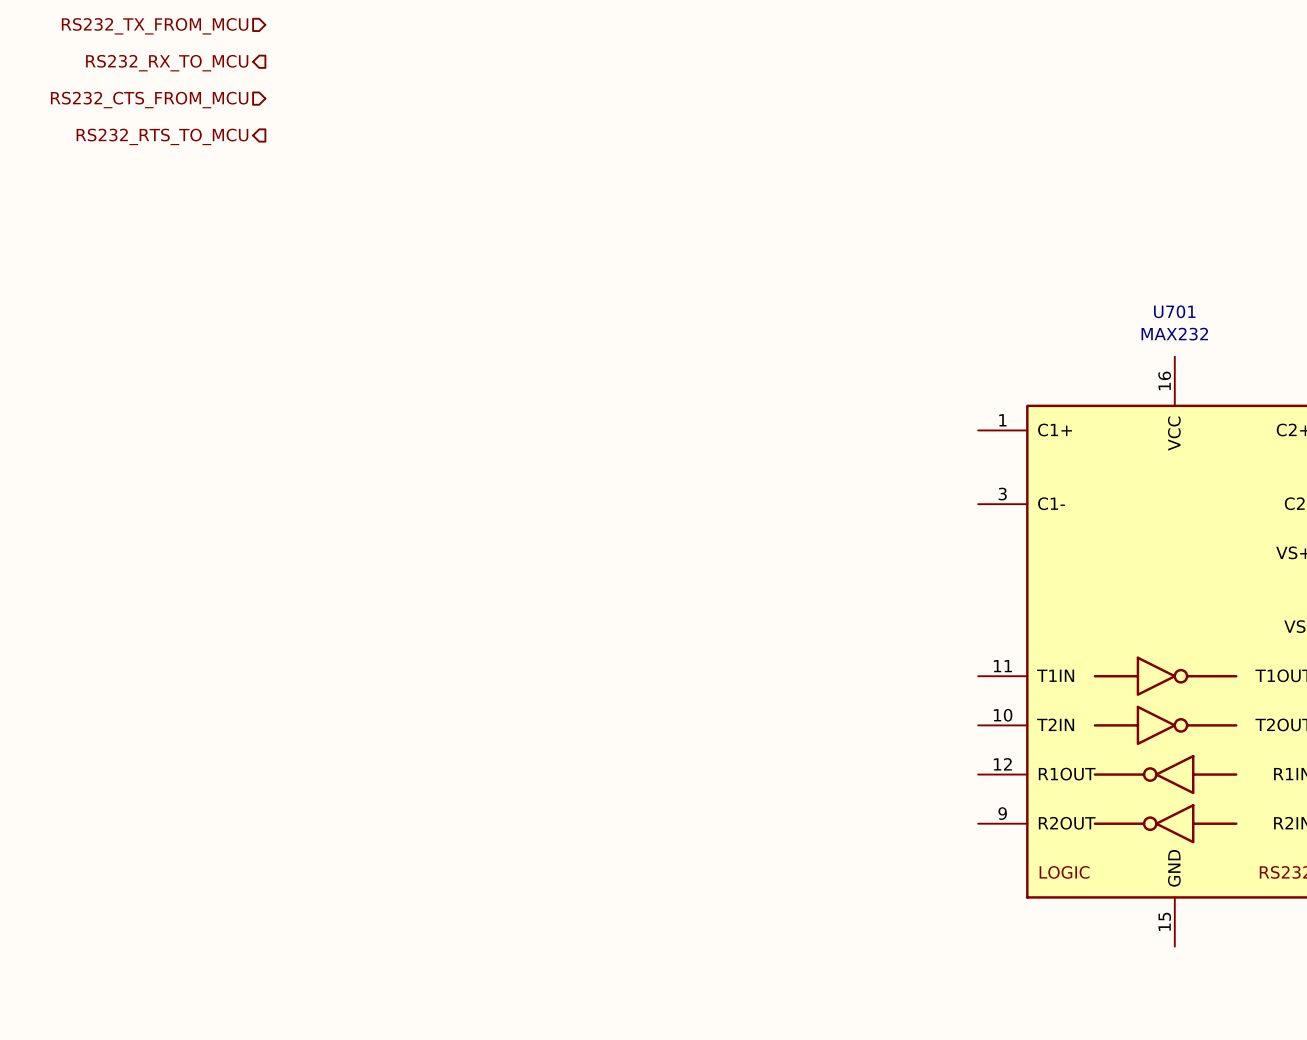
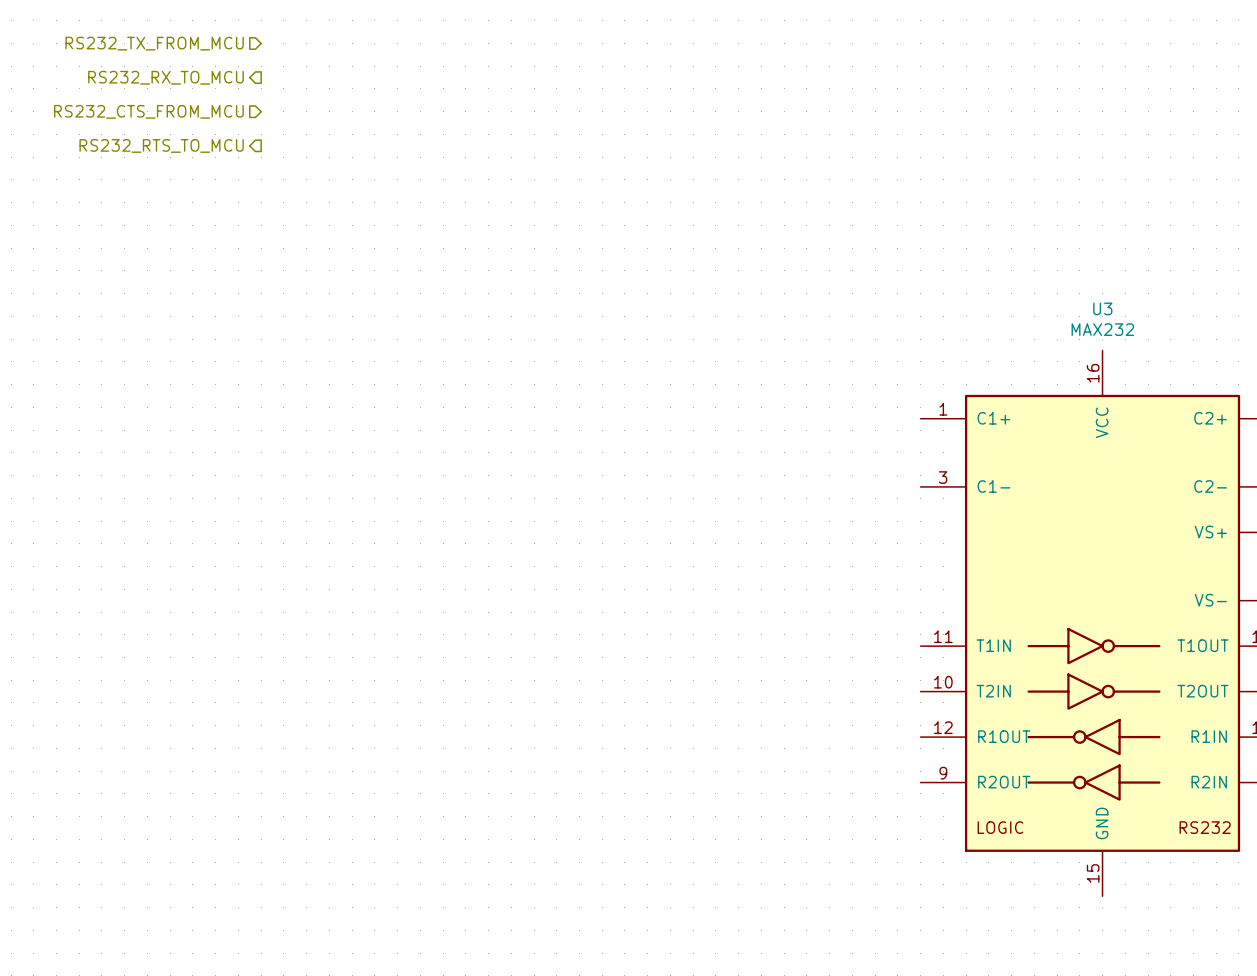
U701 name: U701 (1174, 311) -> U3 (1102, 308)

